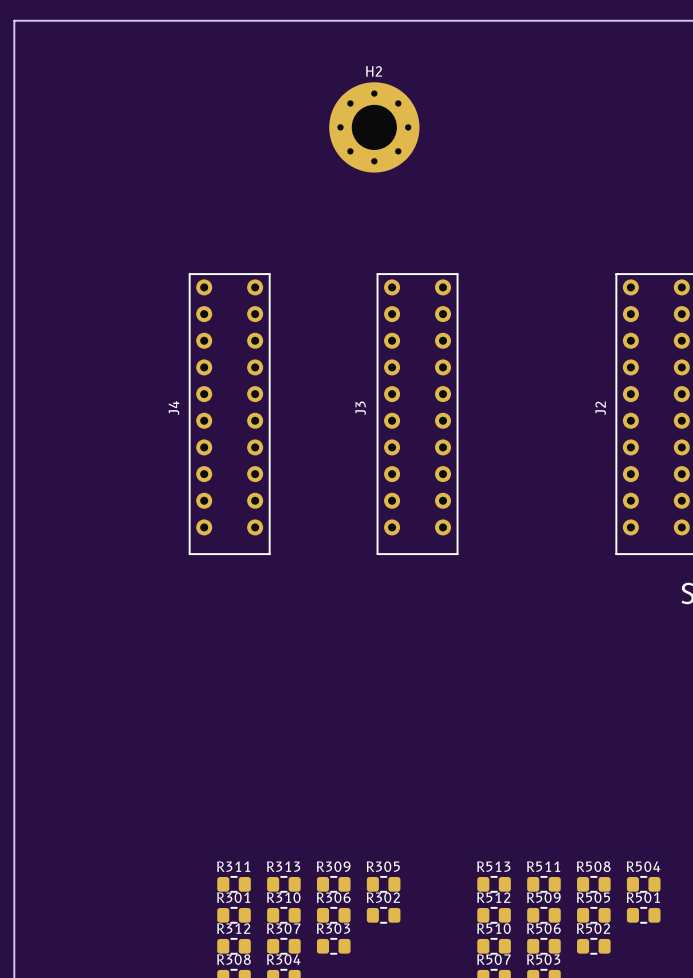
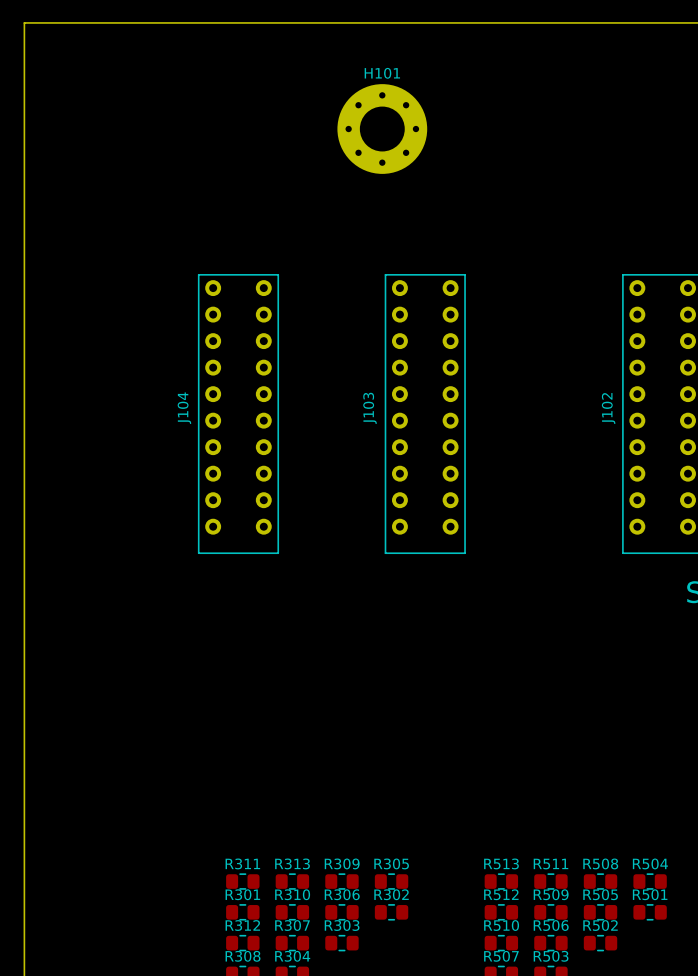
H2 name: H2 (374, 71) -> H101 (382, 73)
J4 name: J4 (173, 408) -> J104 (184, 408)
J3 name: J3 (360, 408) -> J103 (370, 408)
J2 name: J2 (600, 408) -> J102 (608, 408)

